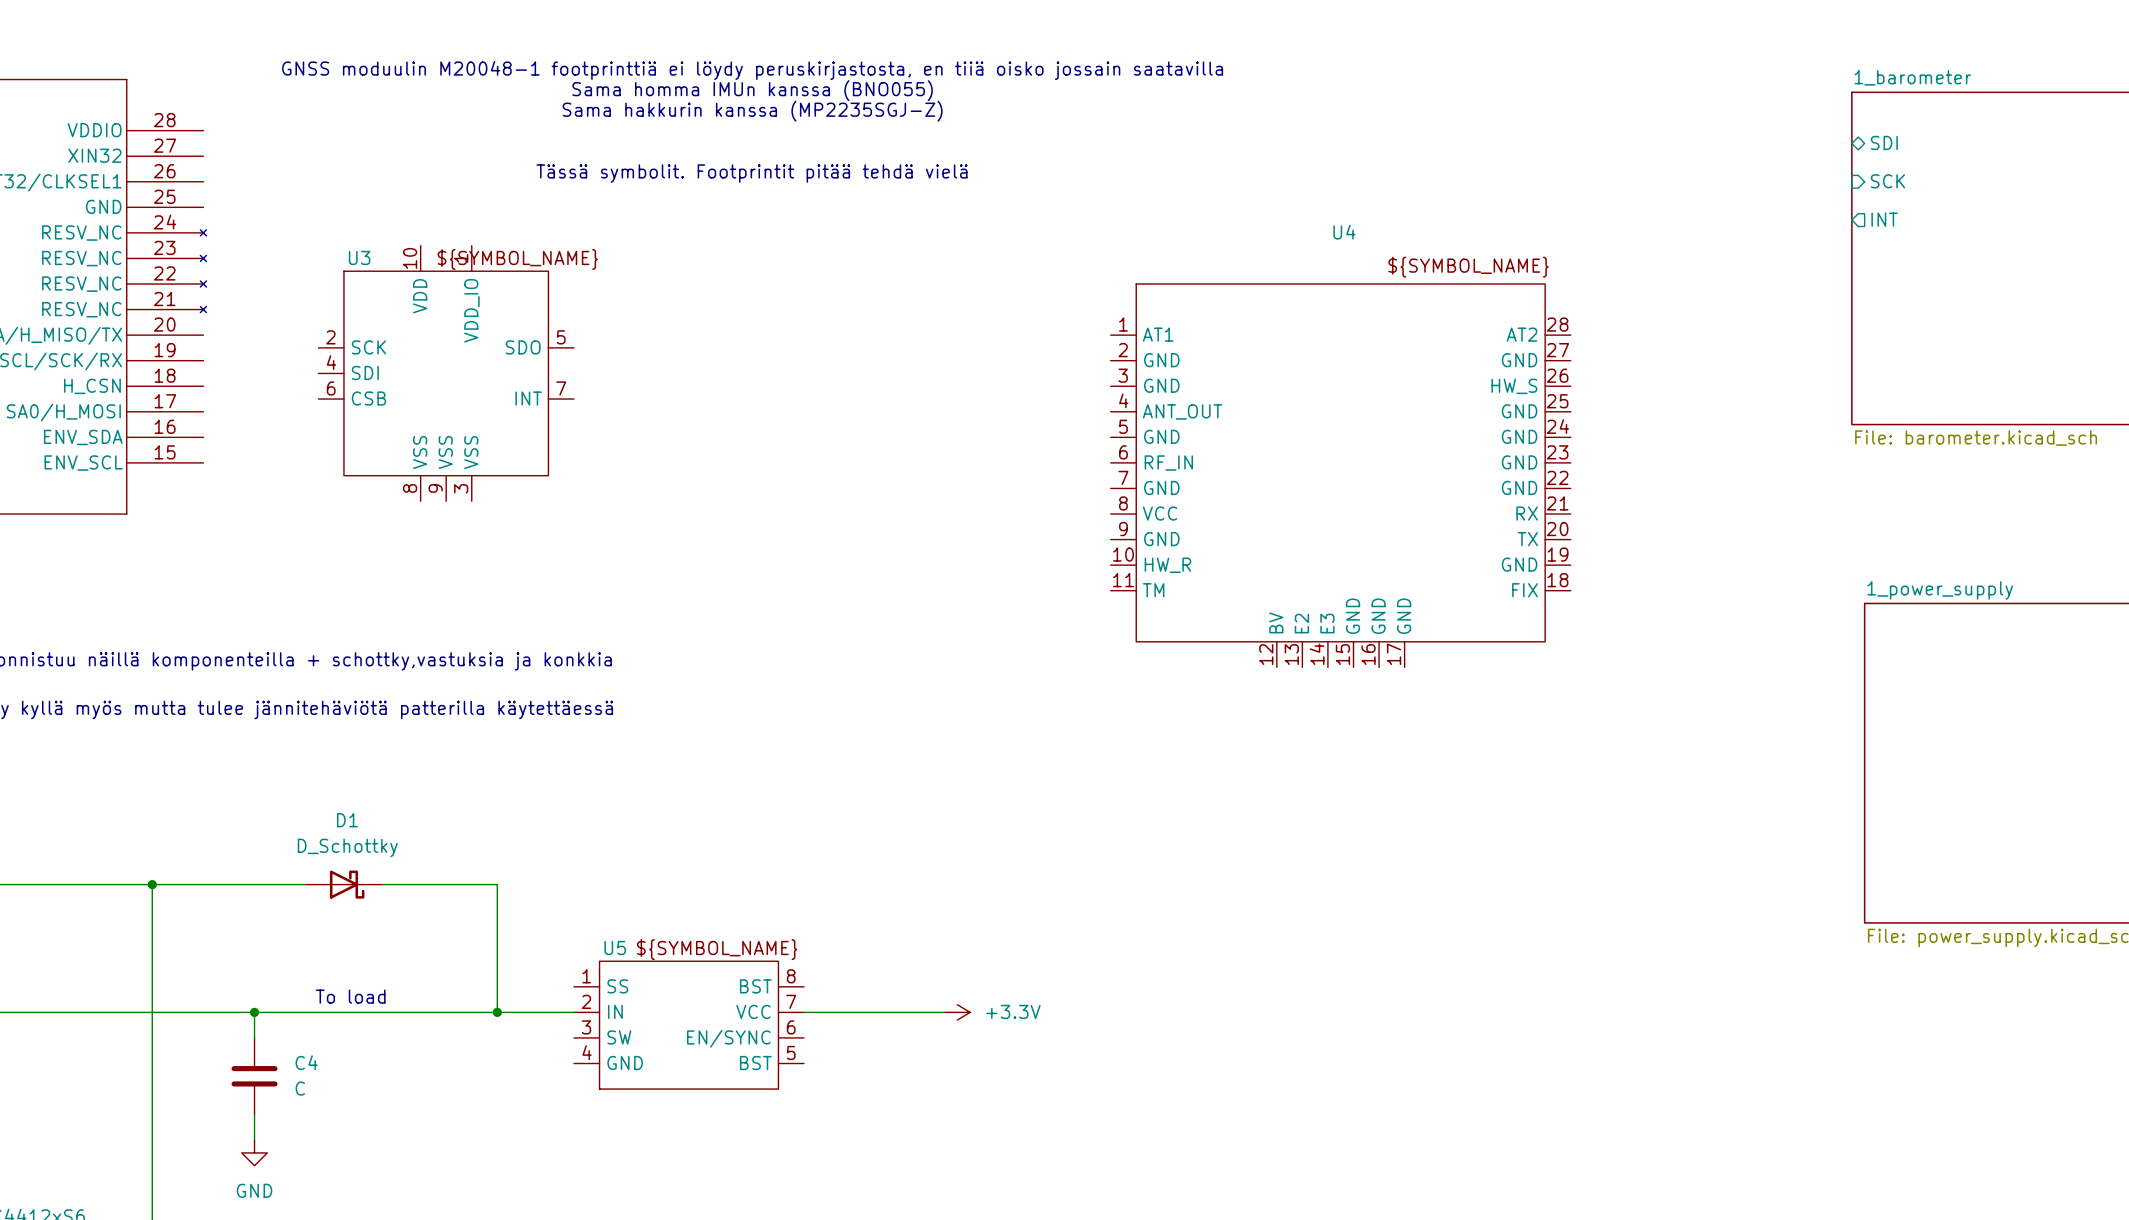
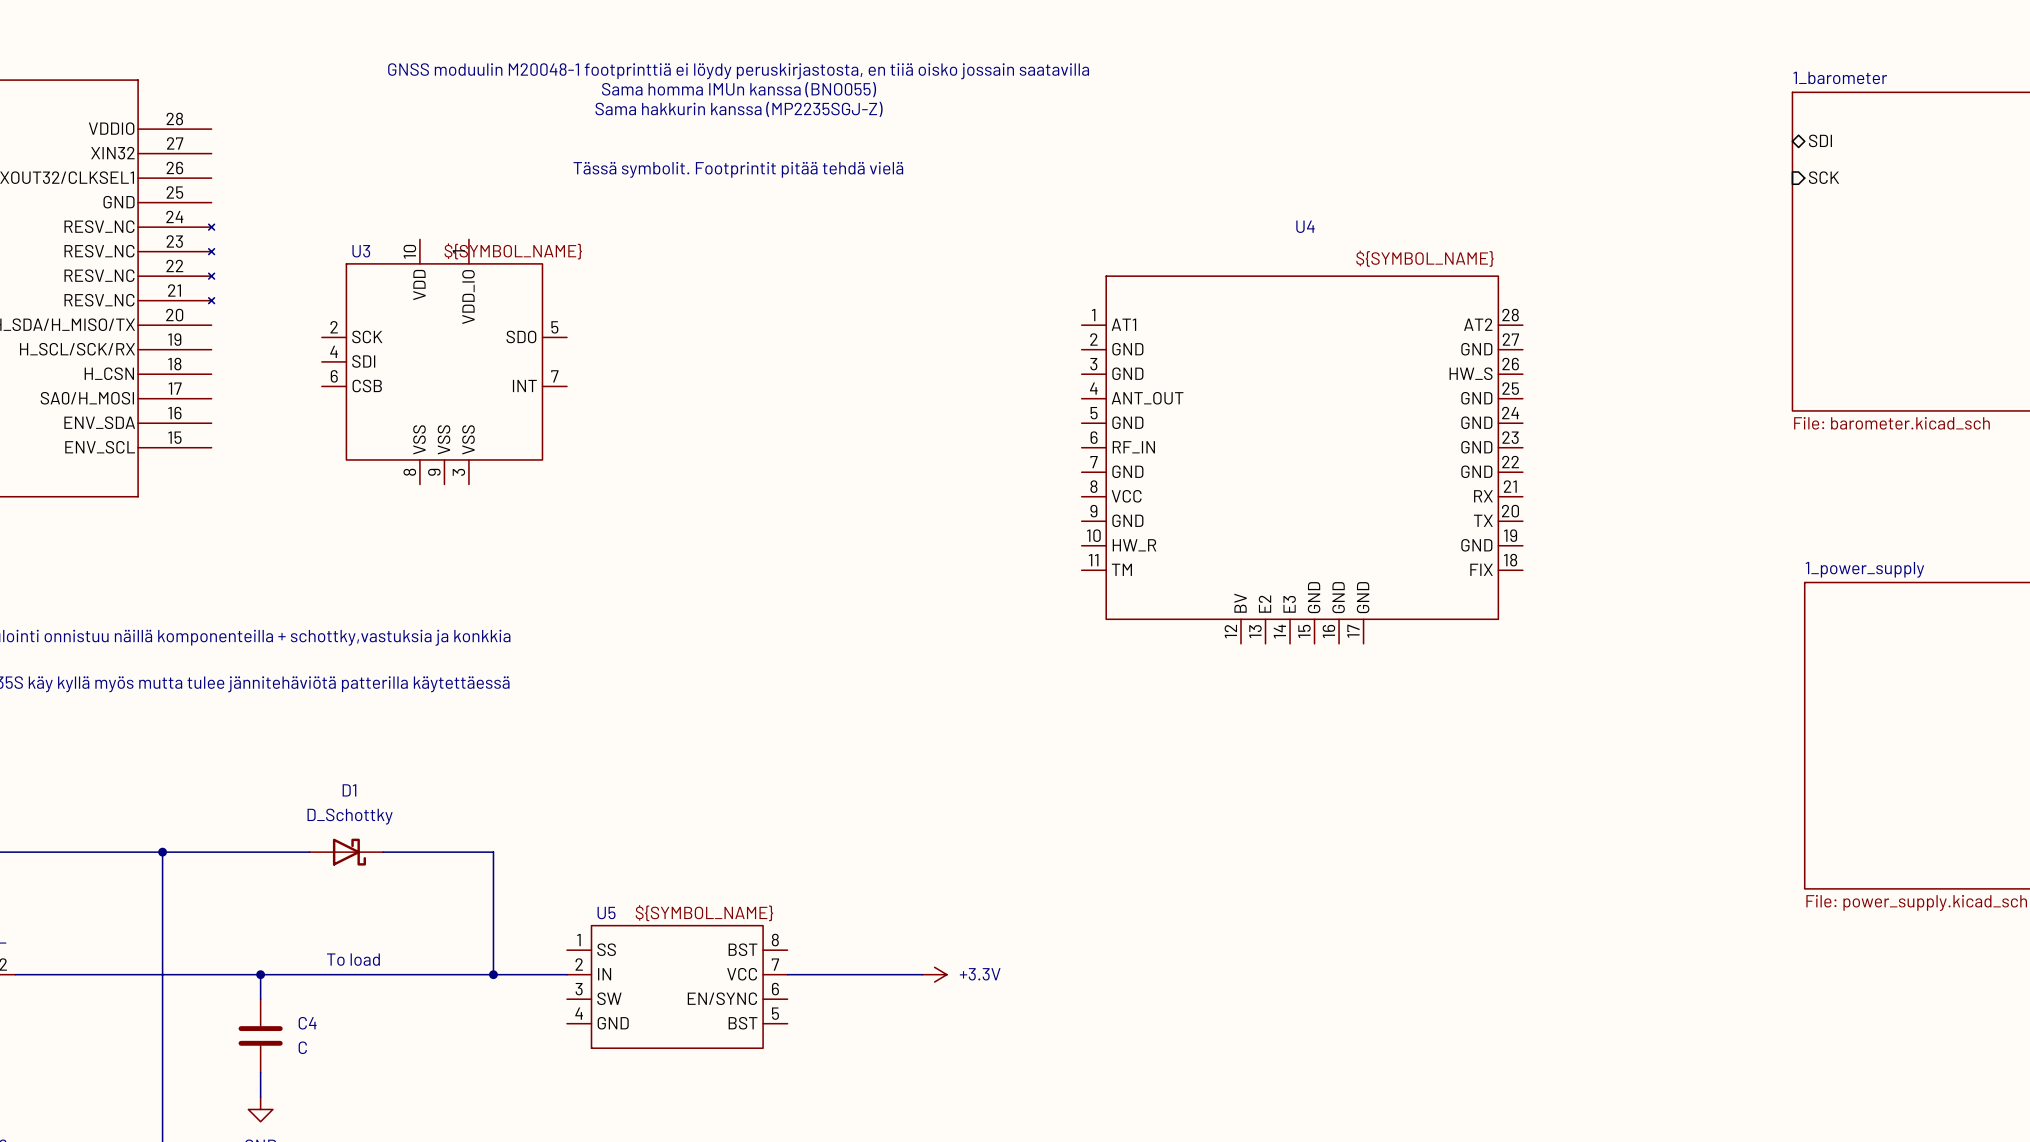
sheet pin: INT (1884, 219) -> none

